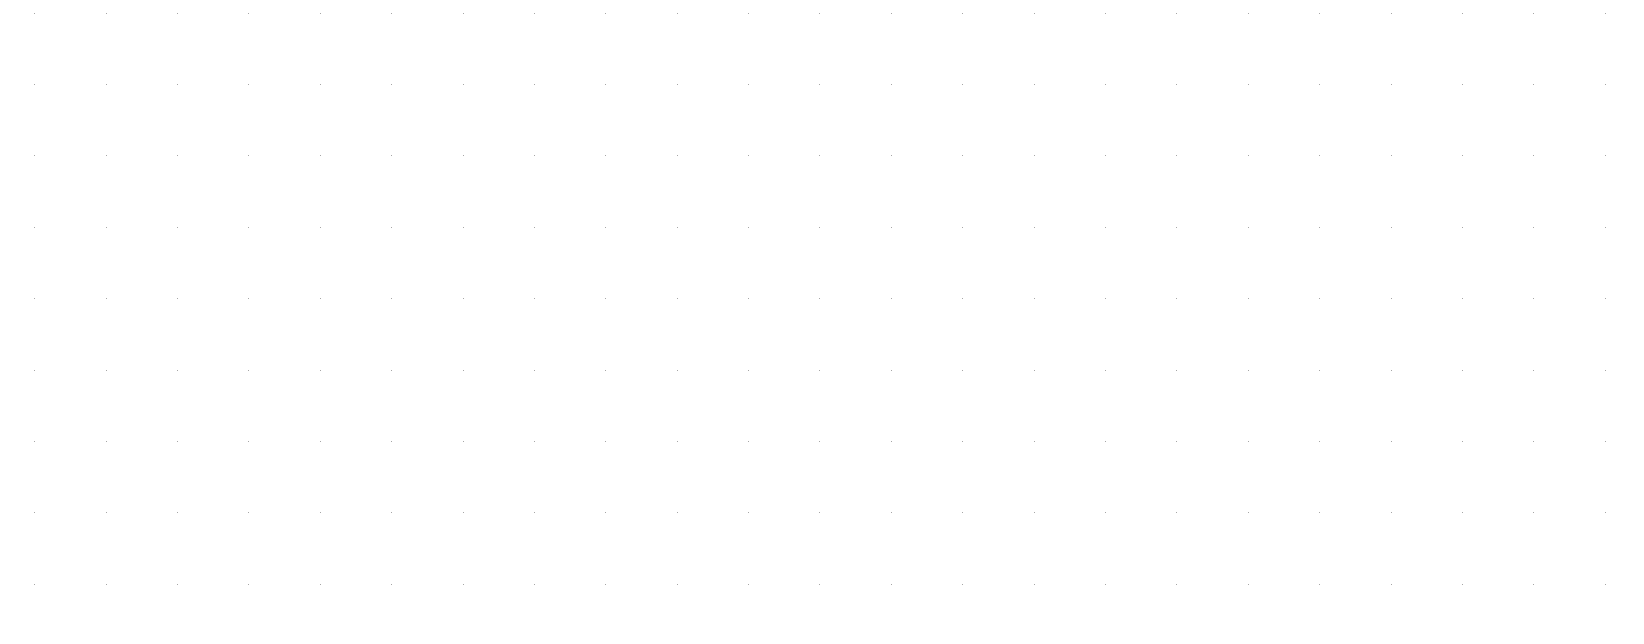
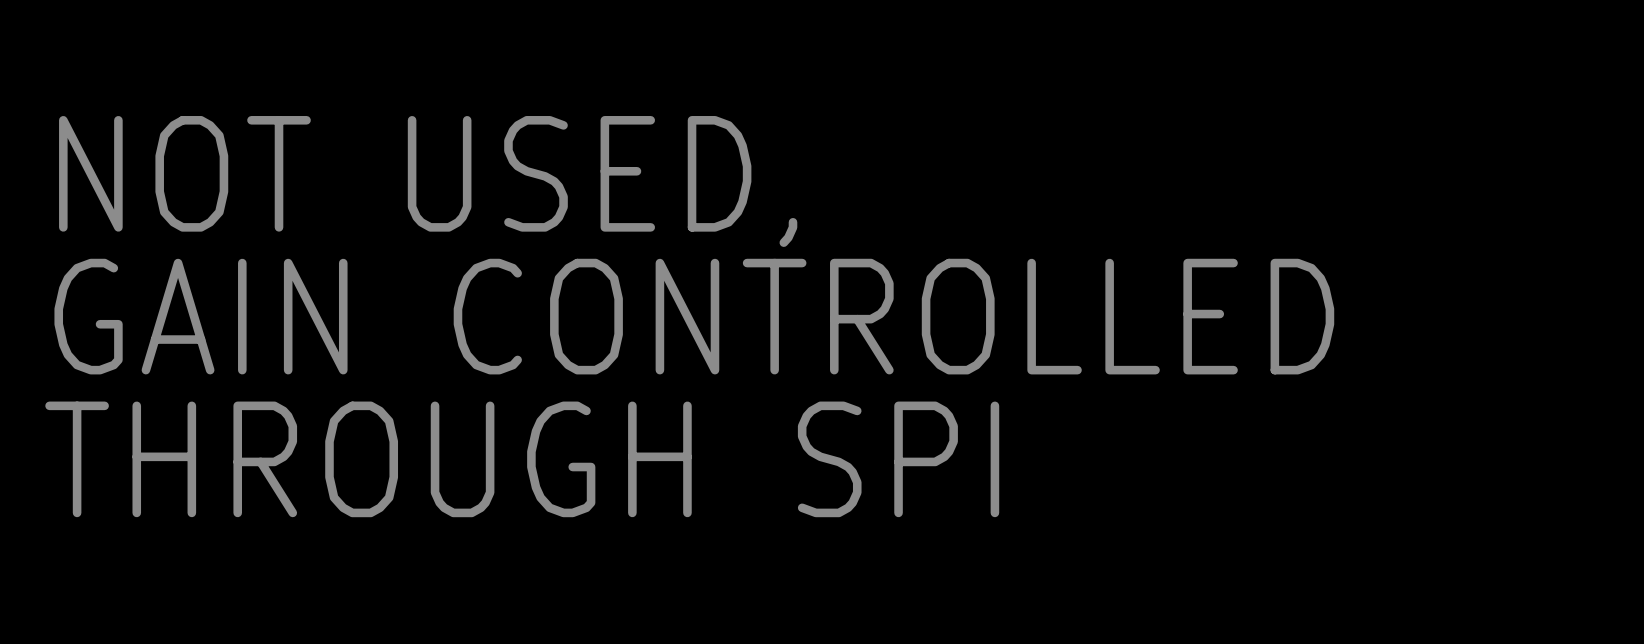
text: none -> NOT USED, (428, 181)
text: none -> GAIN CONTROLLED (694, 316)
text: none -> THROUGH SPI (522, 459)

